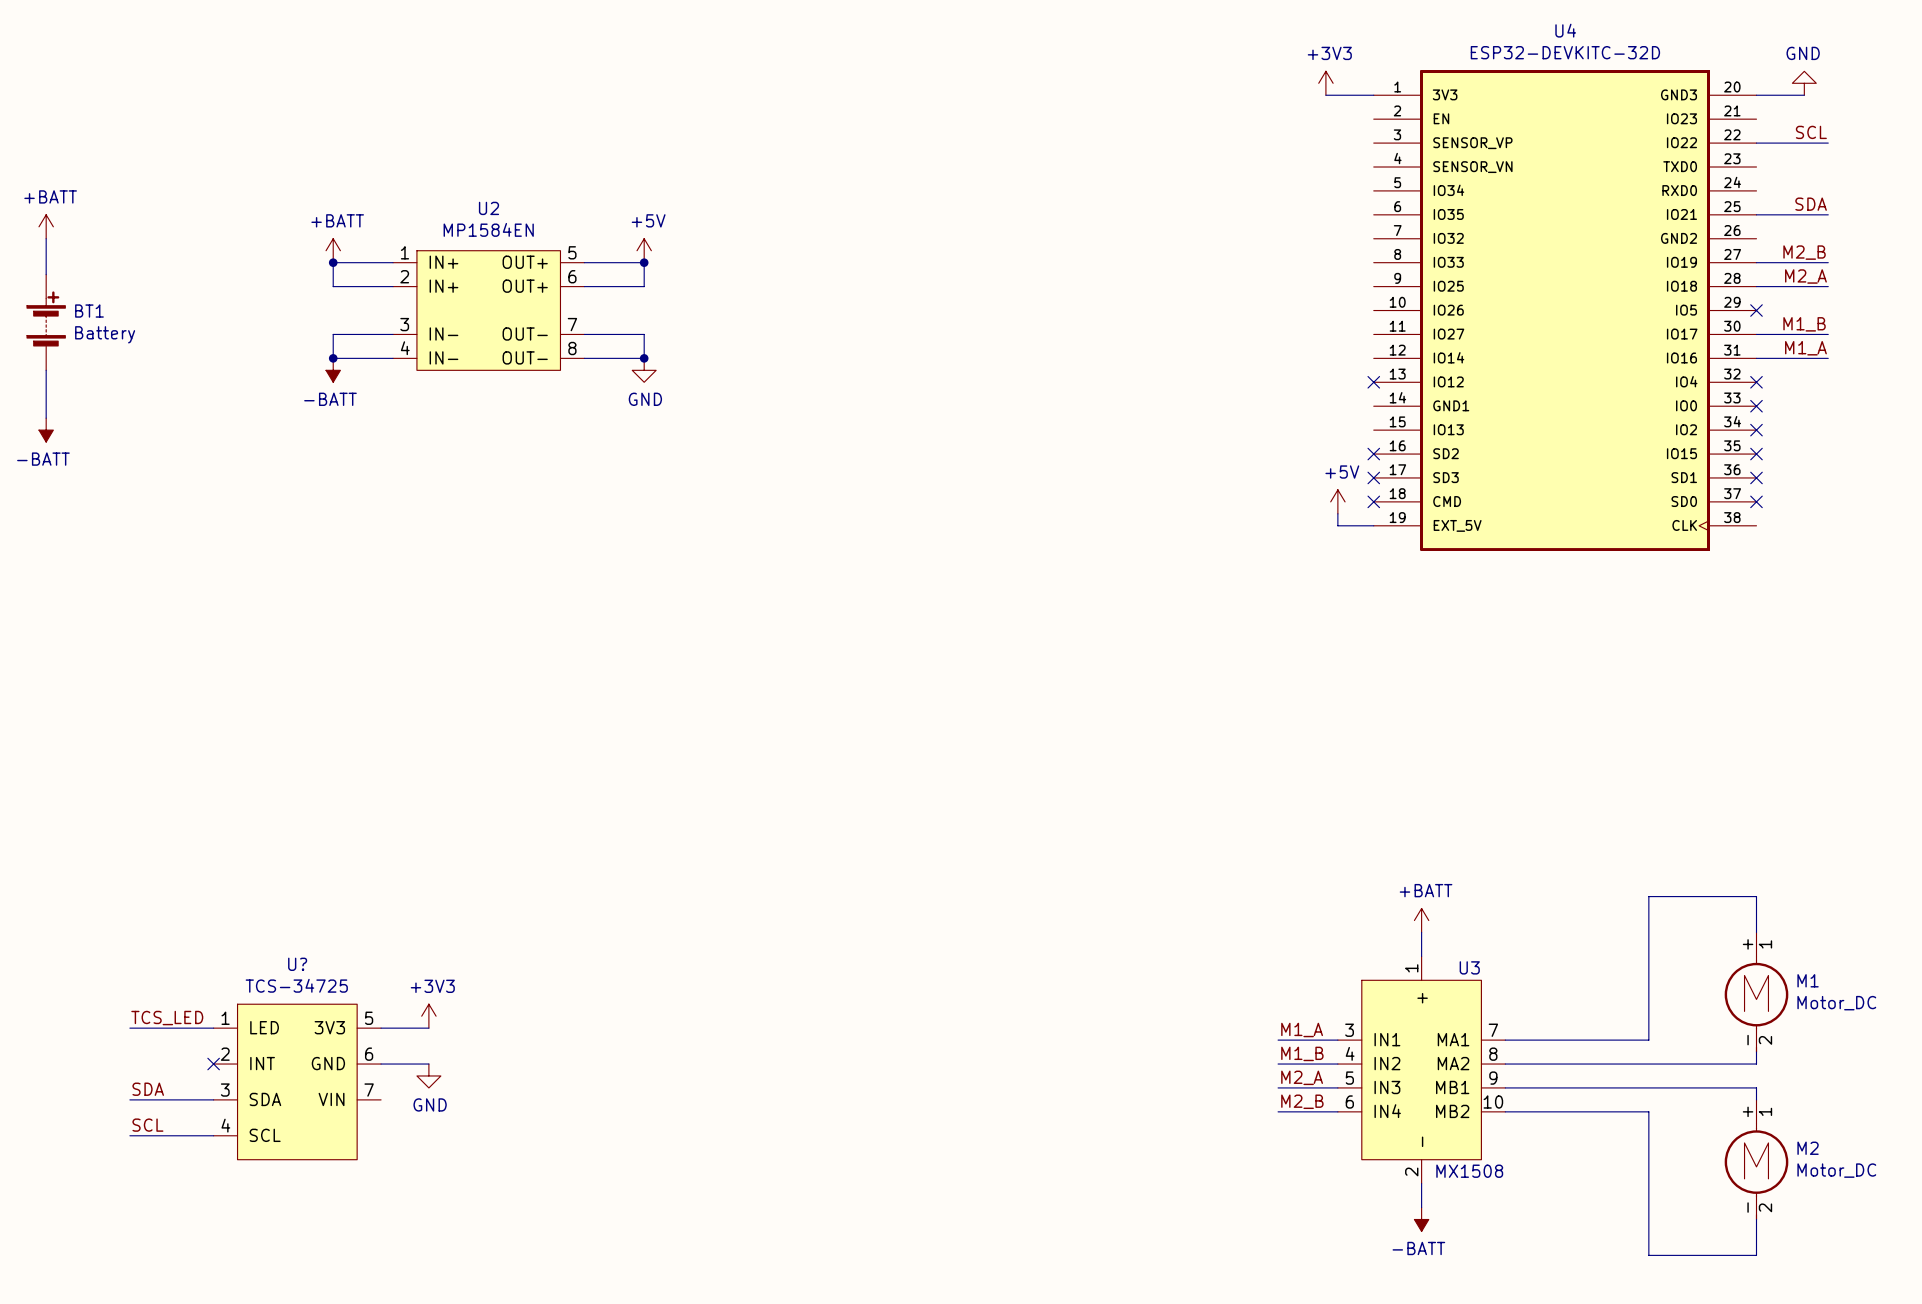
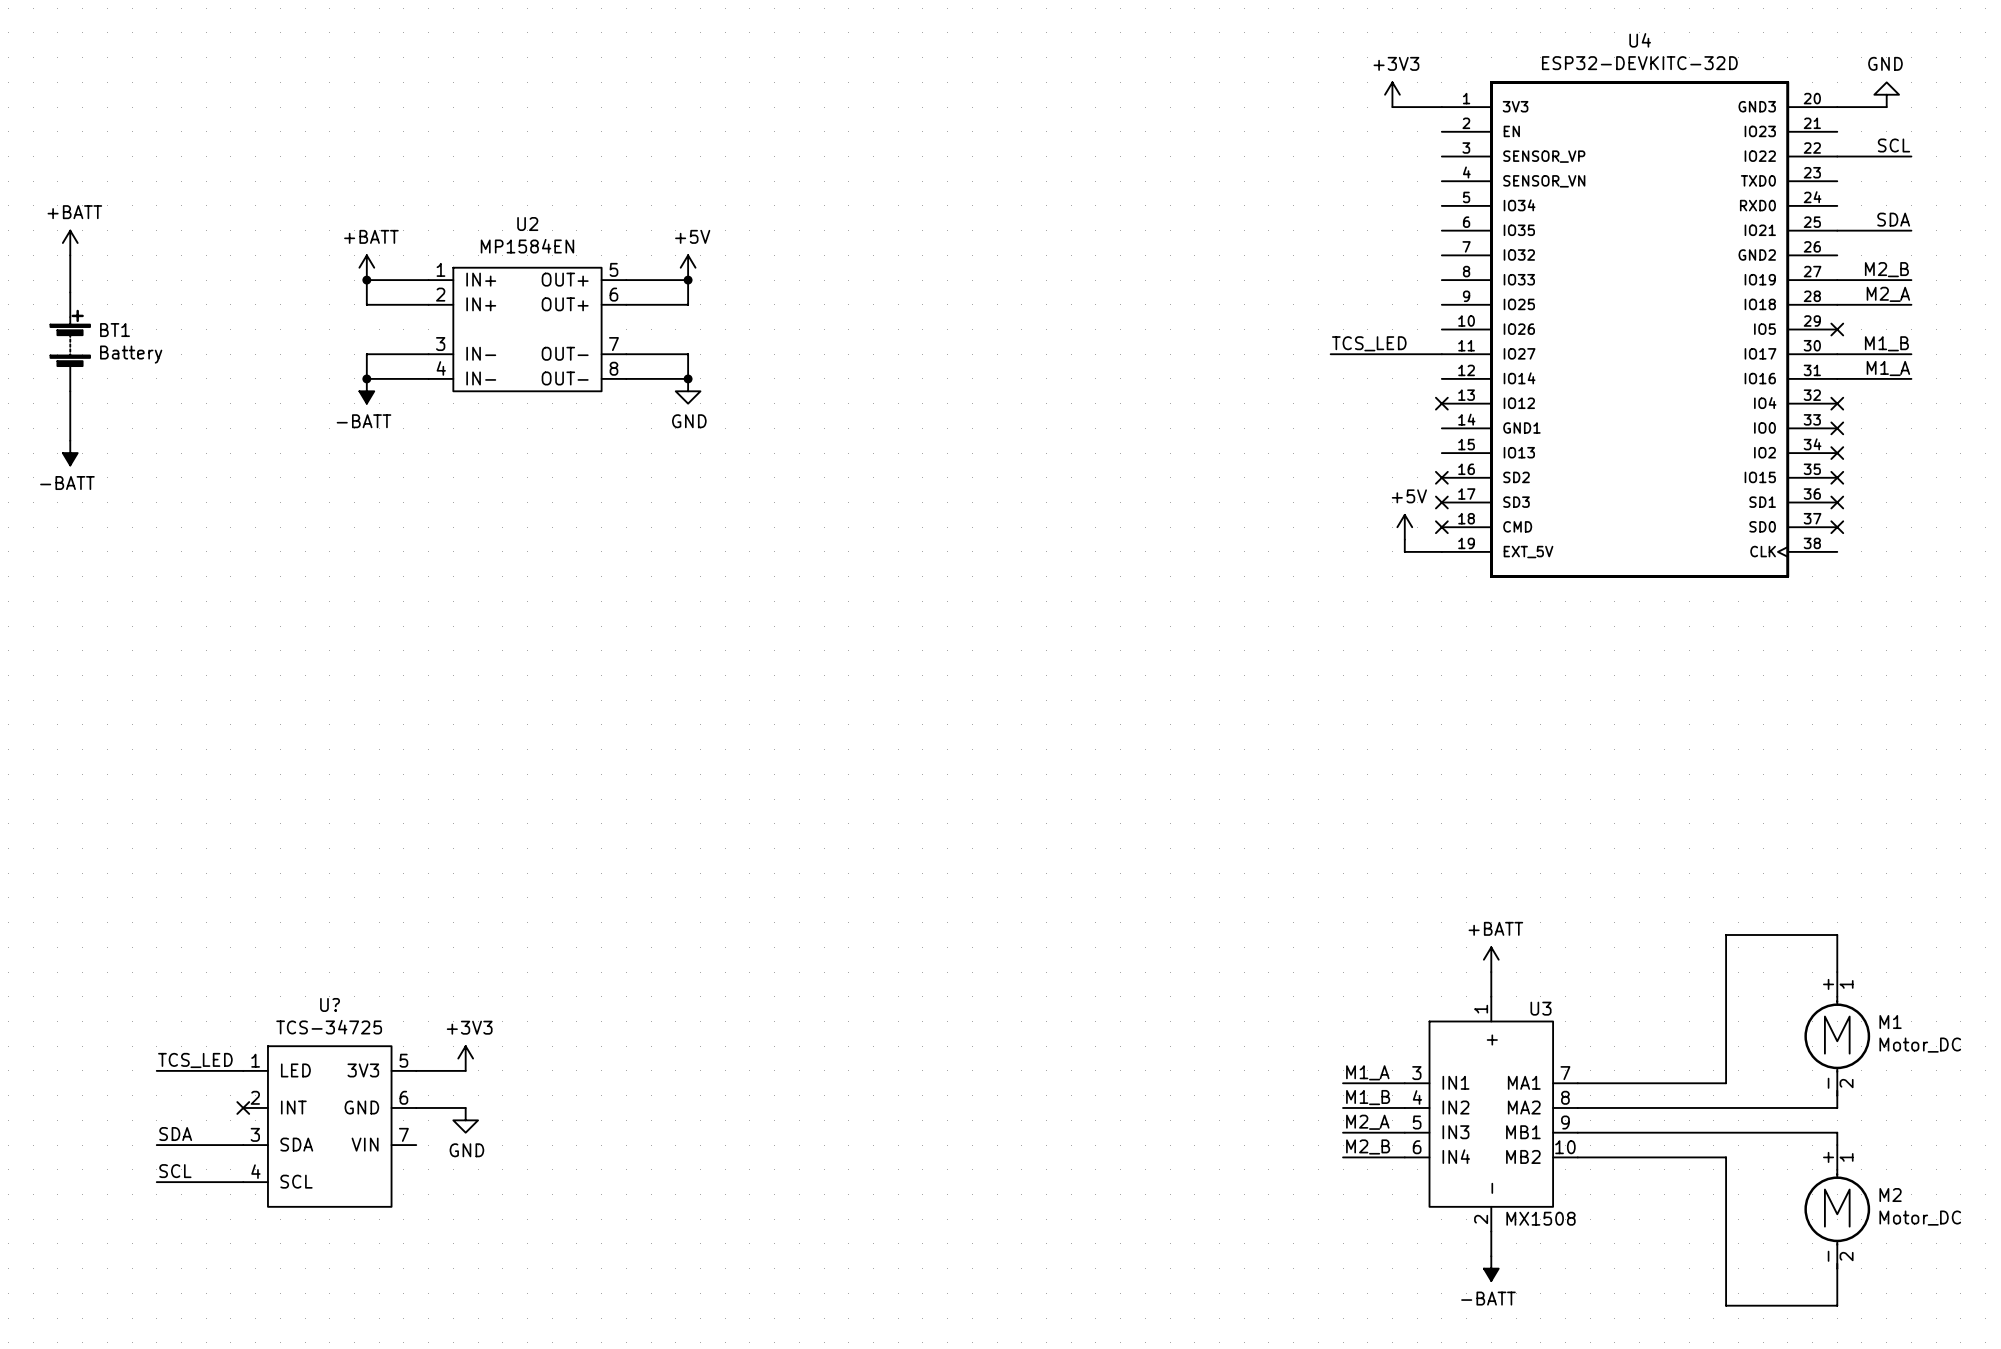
label: none -> TCS_LED (1369, 343)
wire: none -> (1330, 354) (1441, 354)

